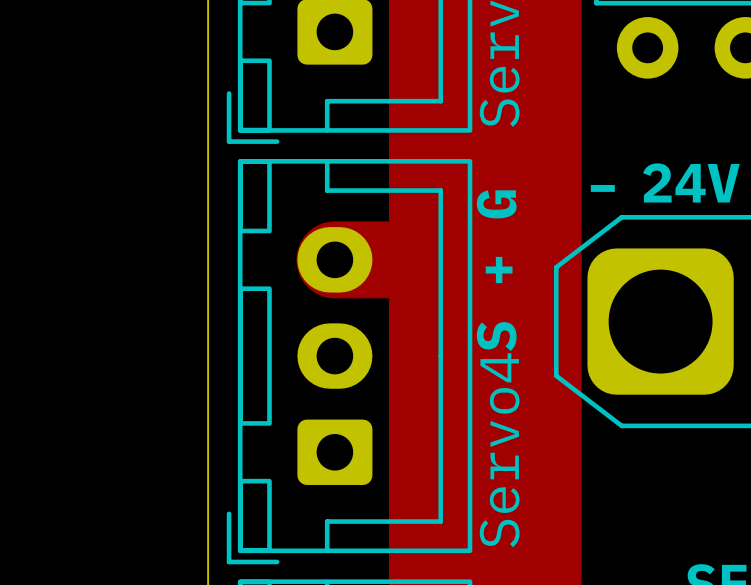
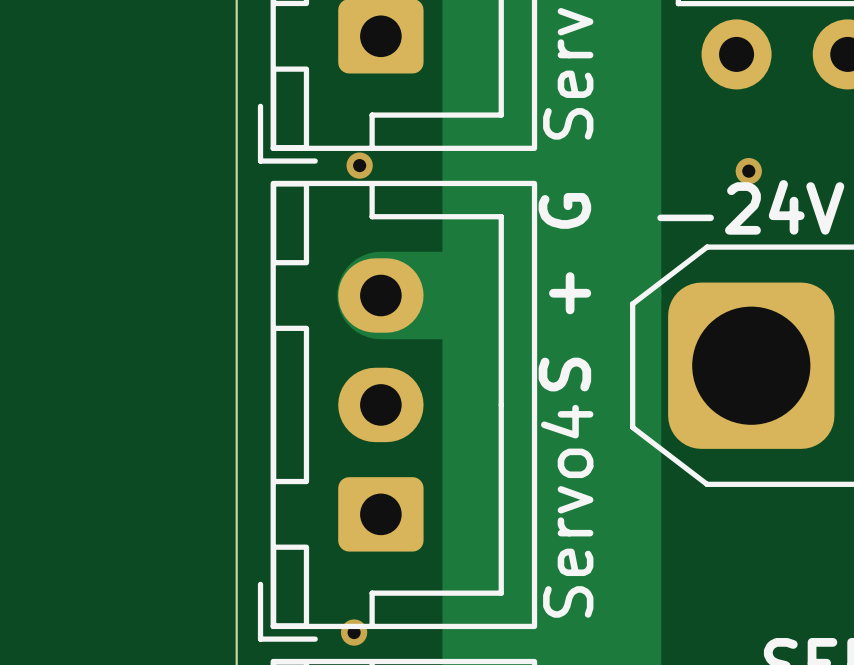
via: none -> (359, 165)
via: none -> (748, 171)
via: none -> (354, 632)

